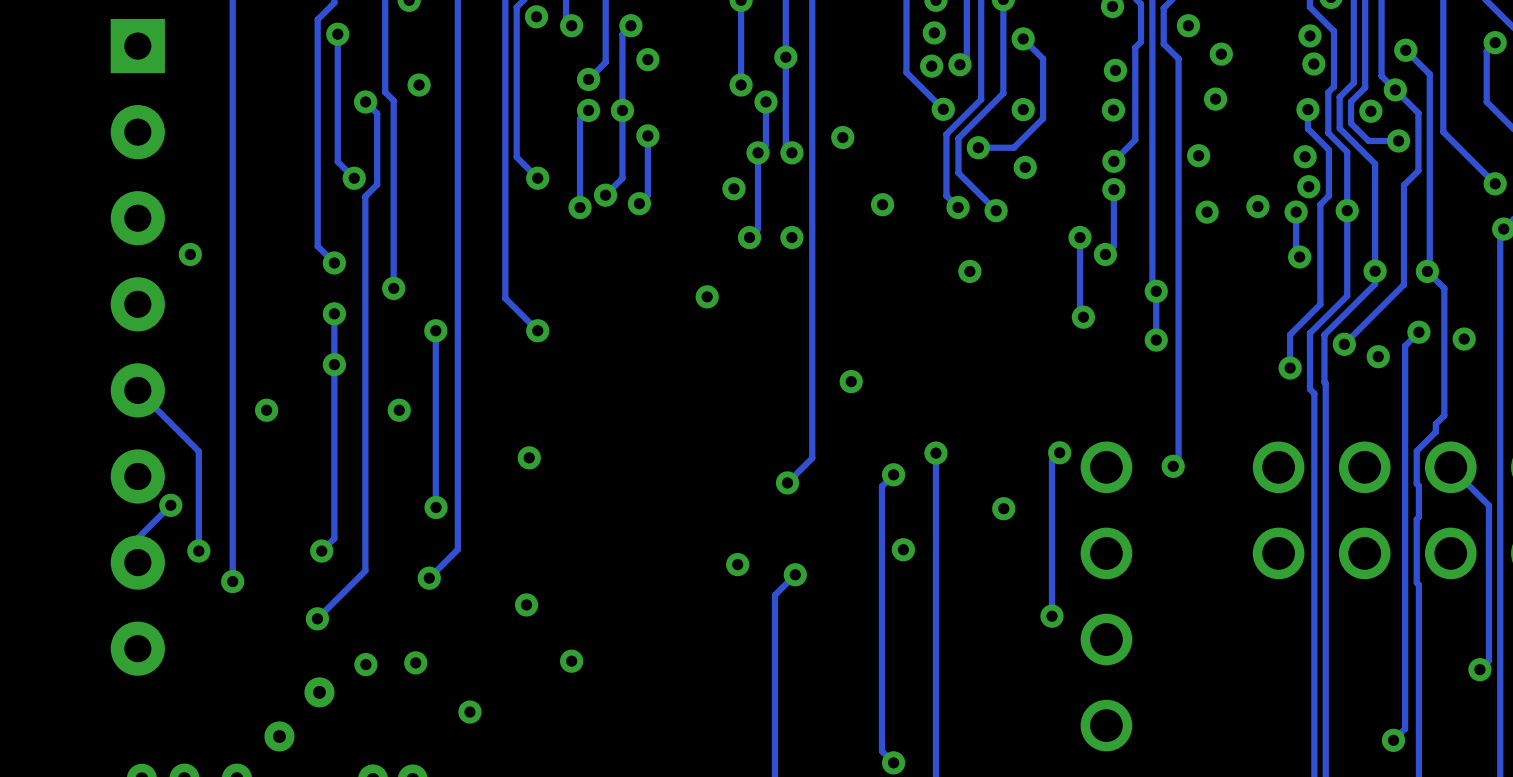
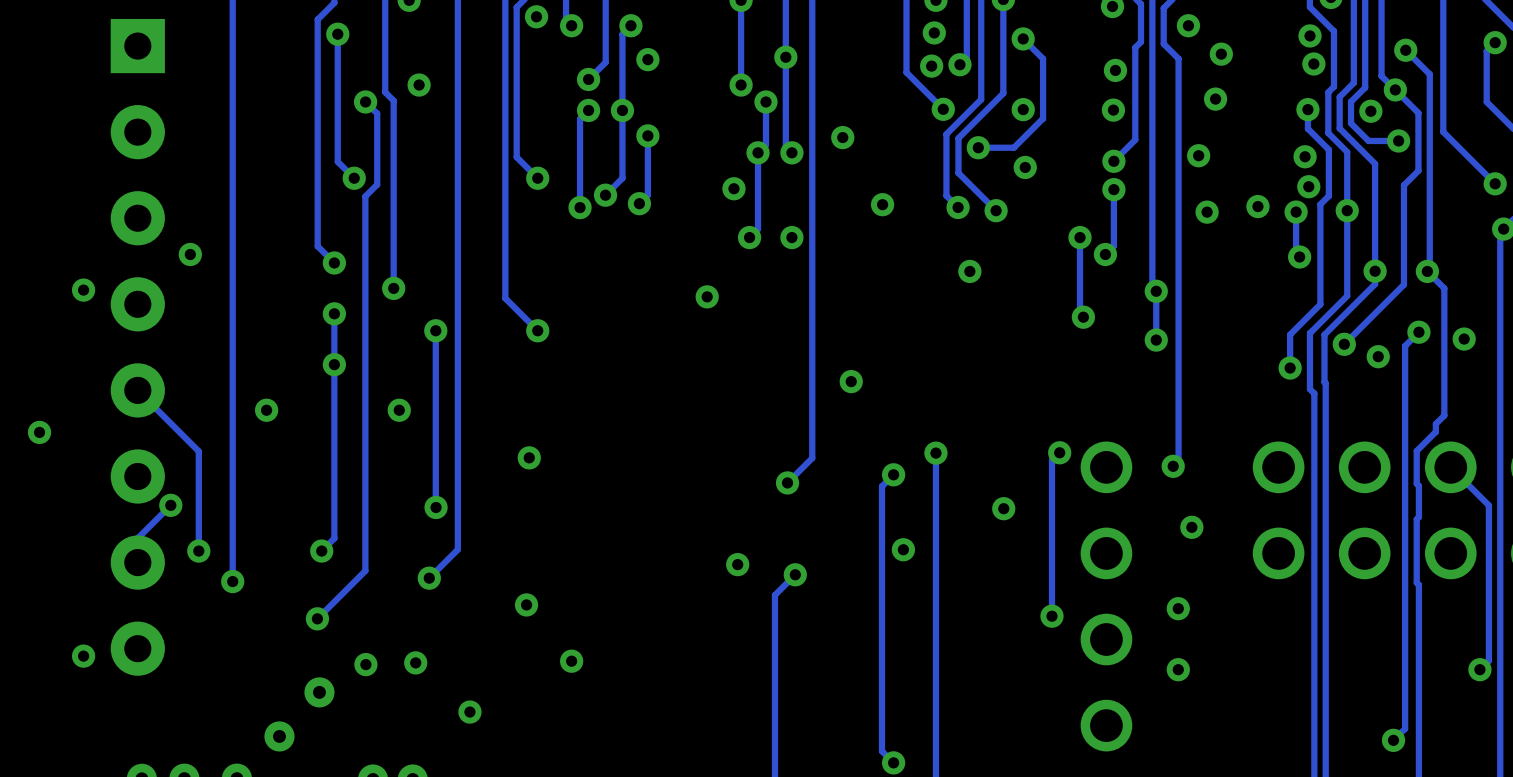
via: none -> (83, 290)
via: none -> (39, 432)
via: none -> (1191, 527)
via: none -> (1178, 608)
via: none -> (83, 656)
via: none -> (1178, 669)

